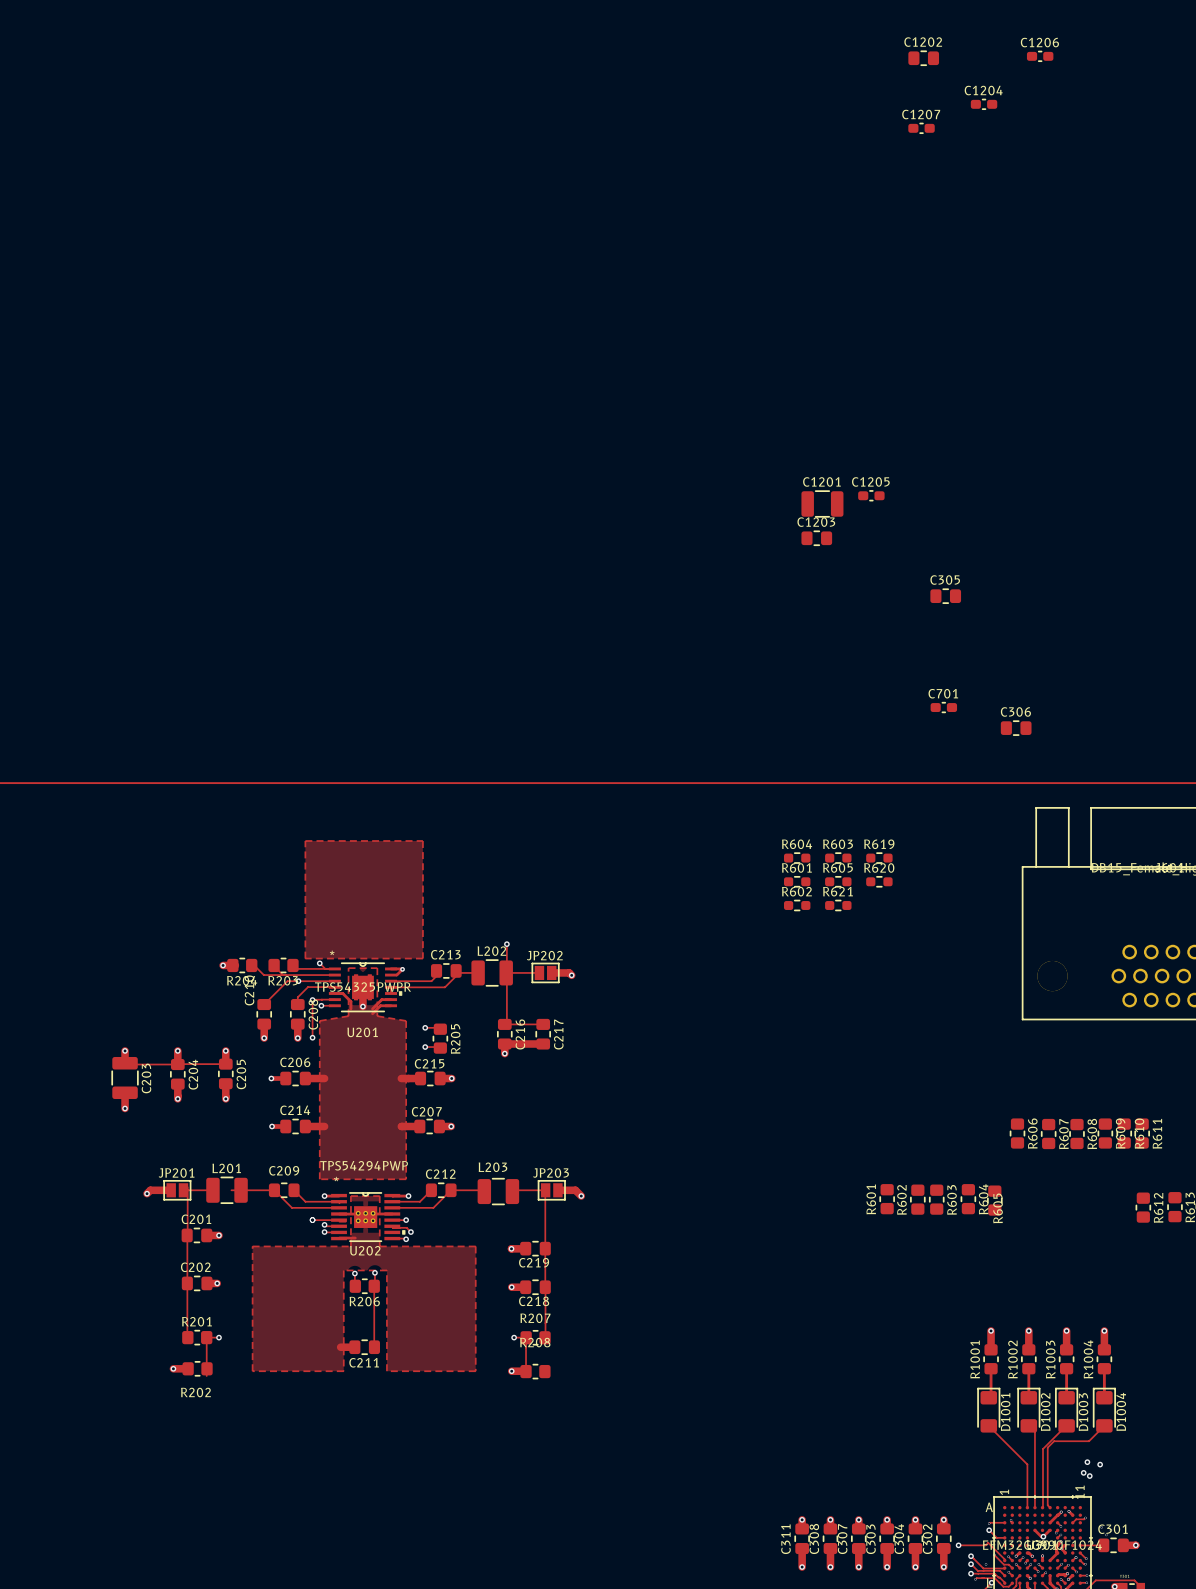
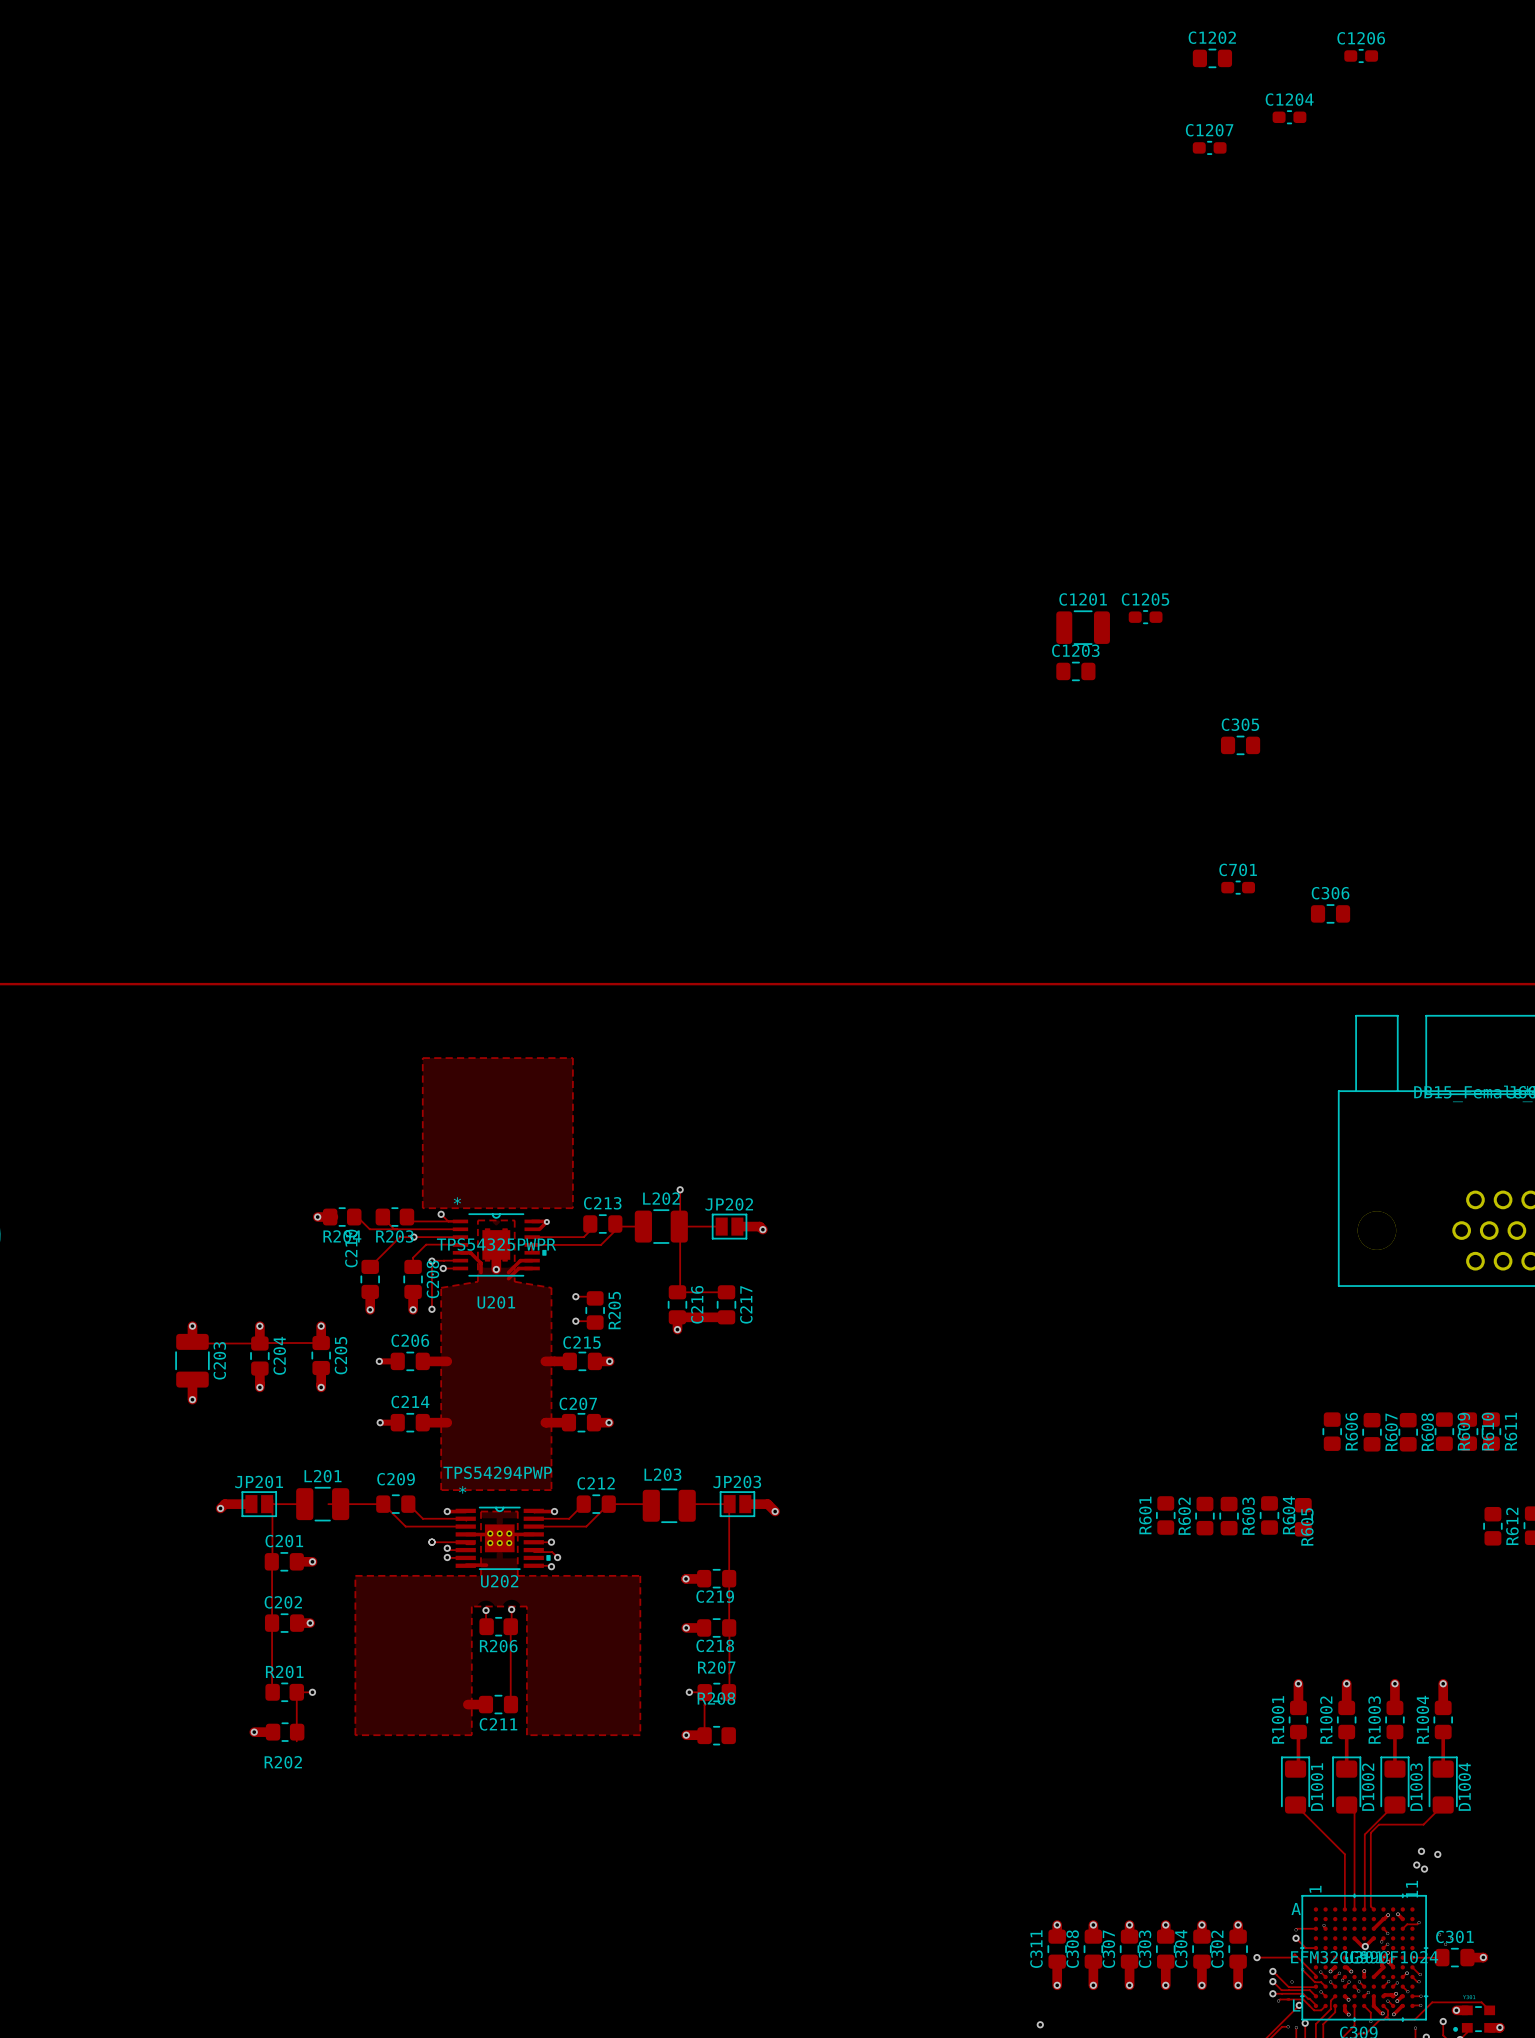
R604: (797, 858) -> none
R603: (838, 858) -> none
R619: (879, 858) -> none
R601: (797, 881) -> none
R605: (838, 881) -> none
R620: (879, 881) -> none
R602: (797, 905) -> none
R621: (838, 905) -> none

